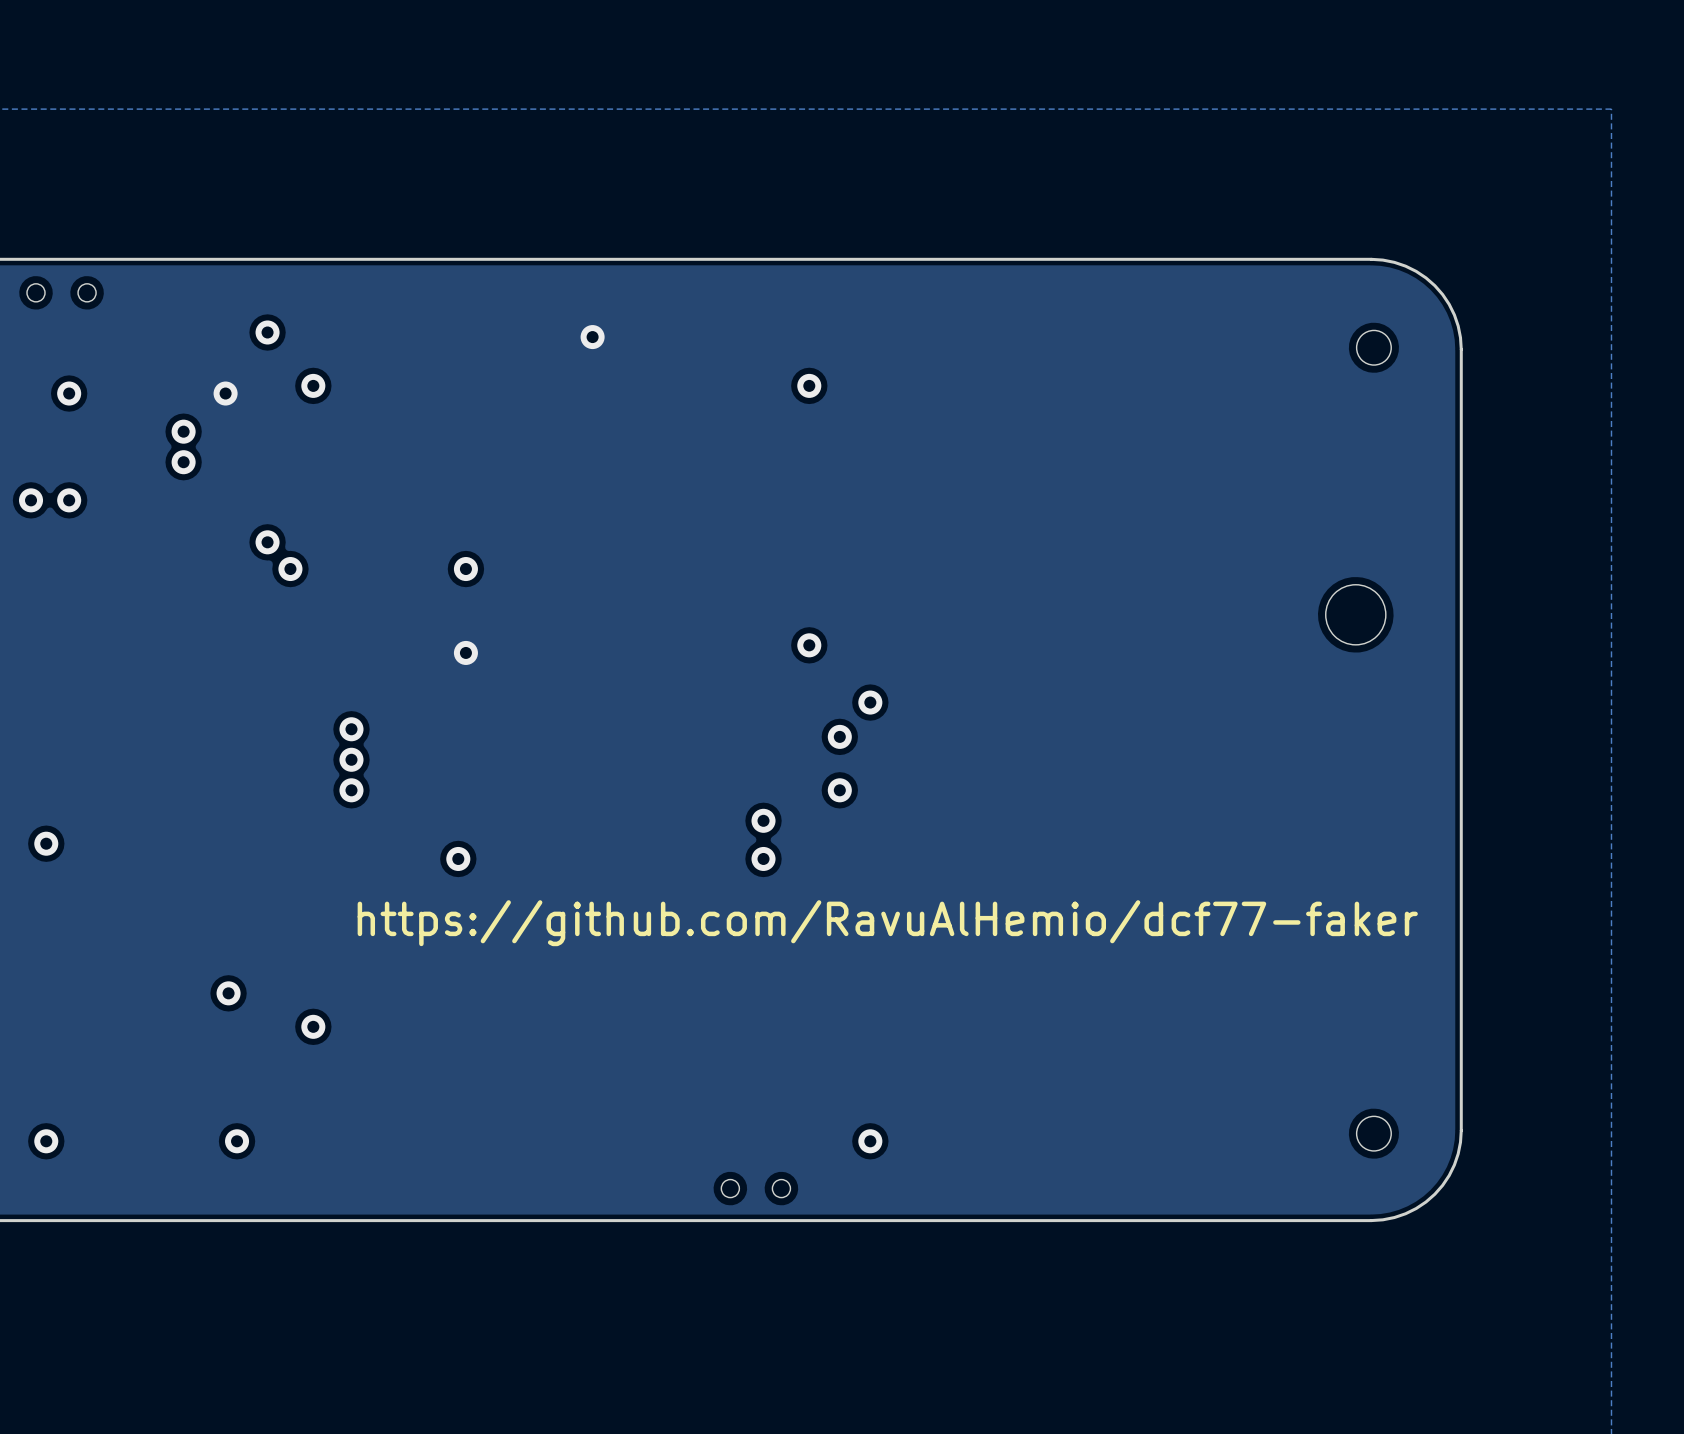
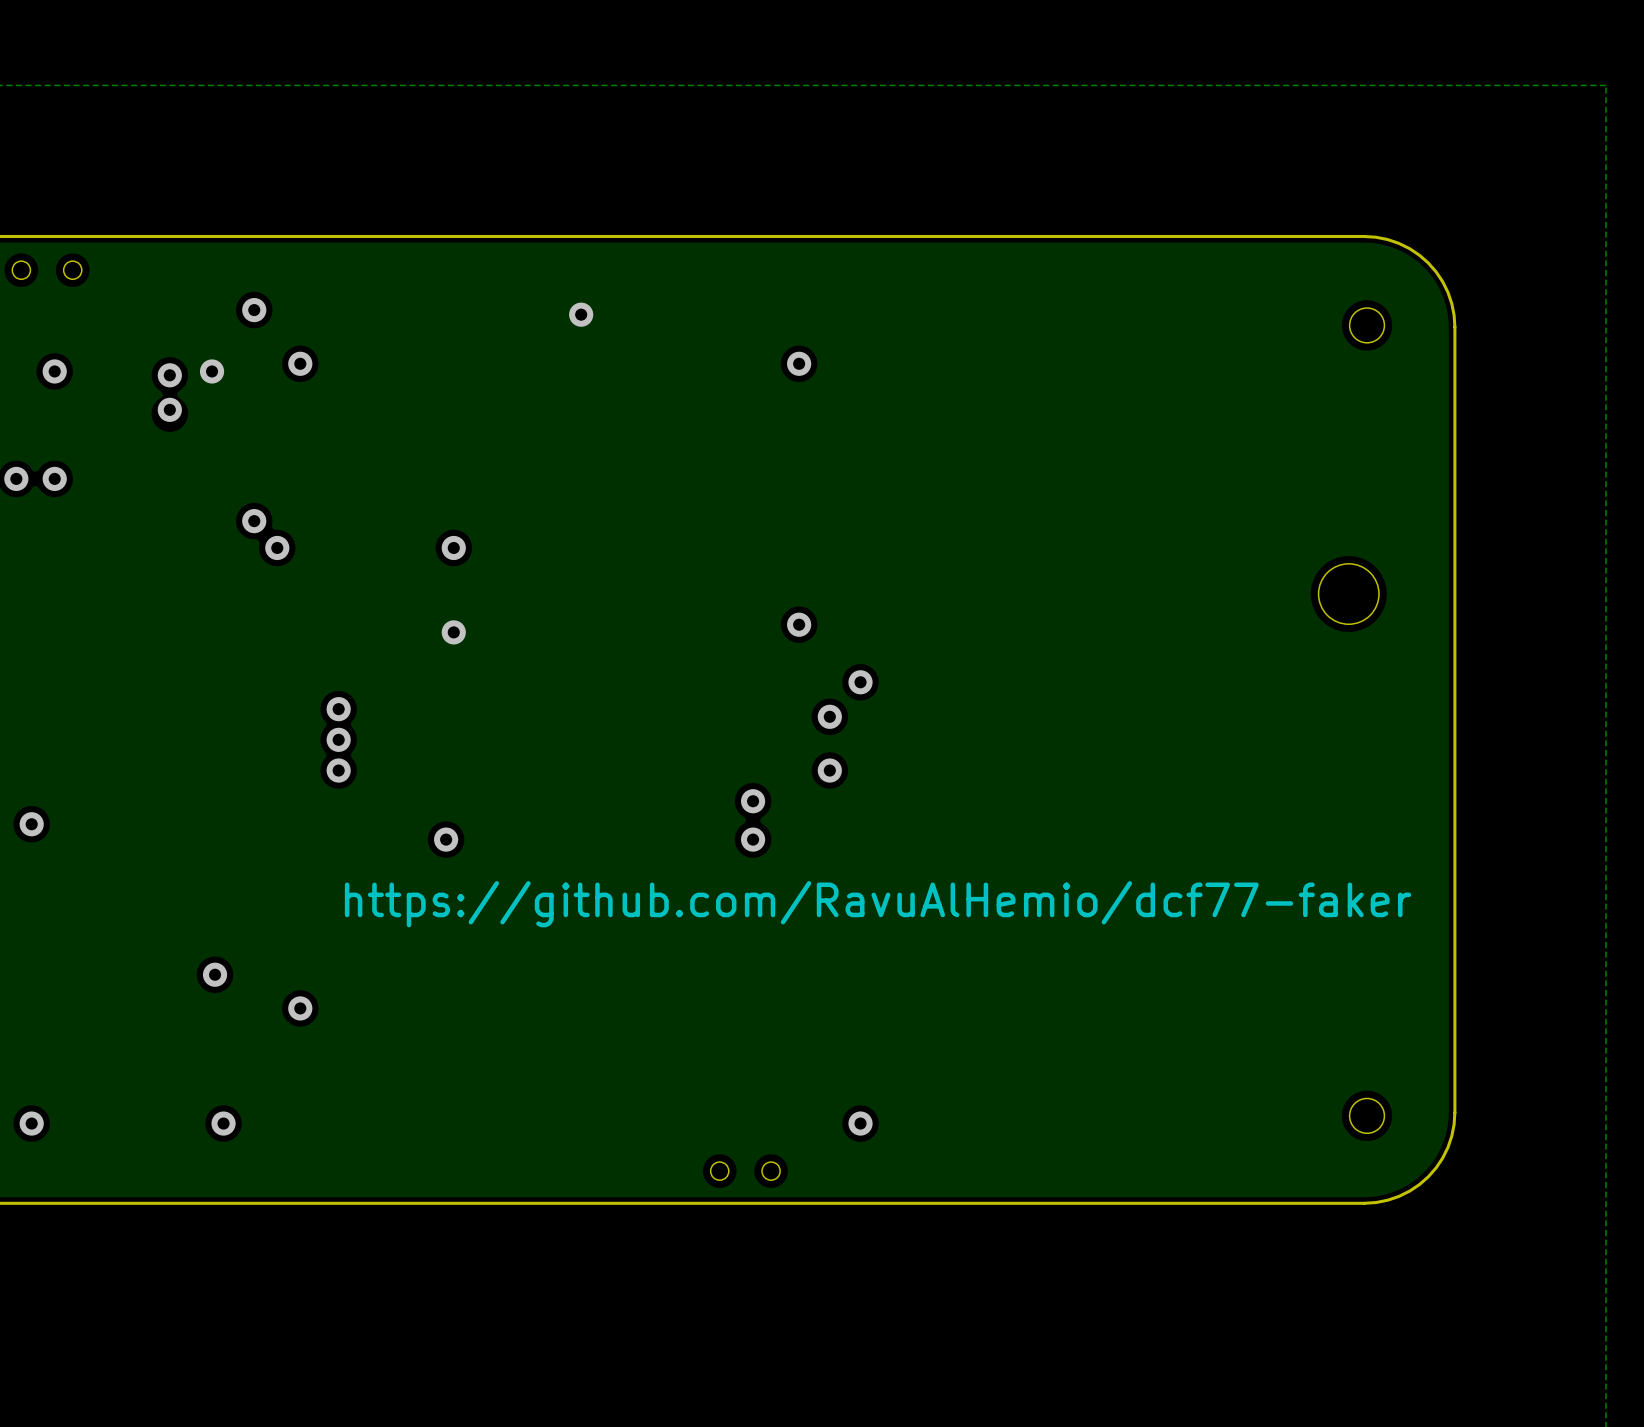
via position: (183, 462) -> (169, 375)

